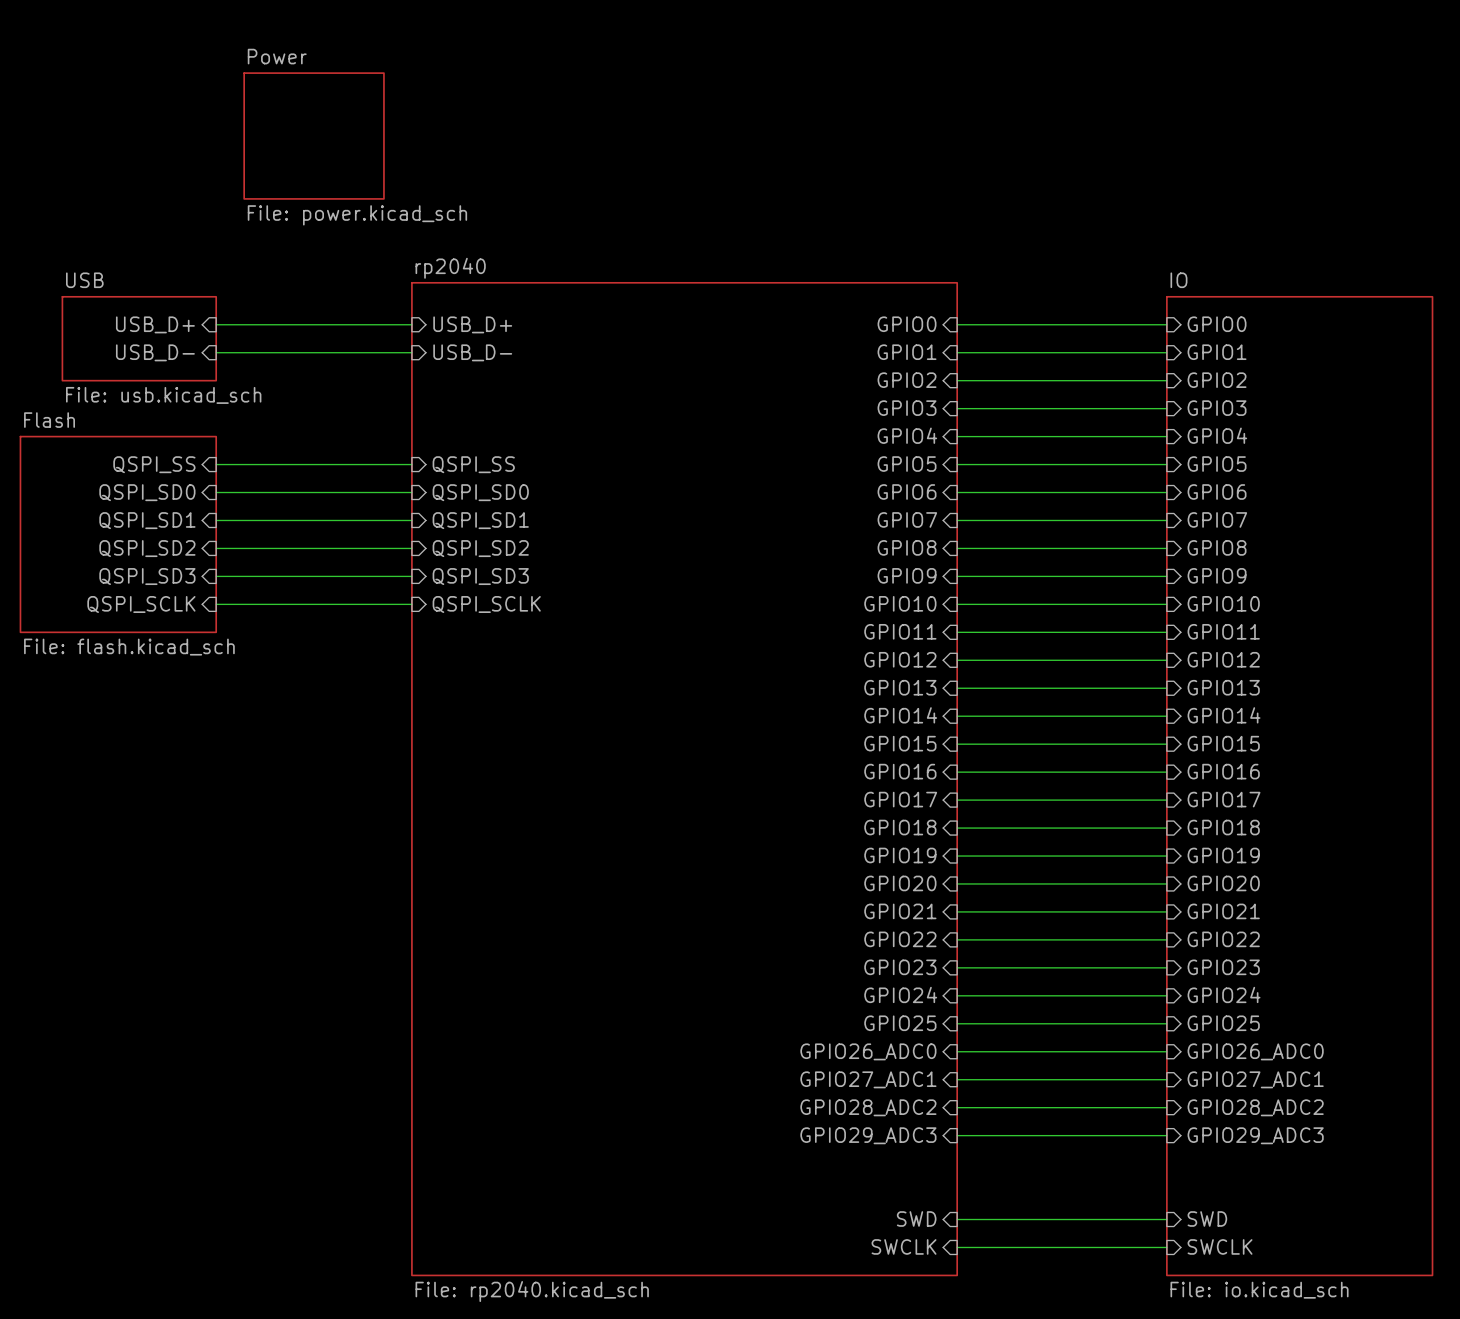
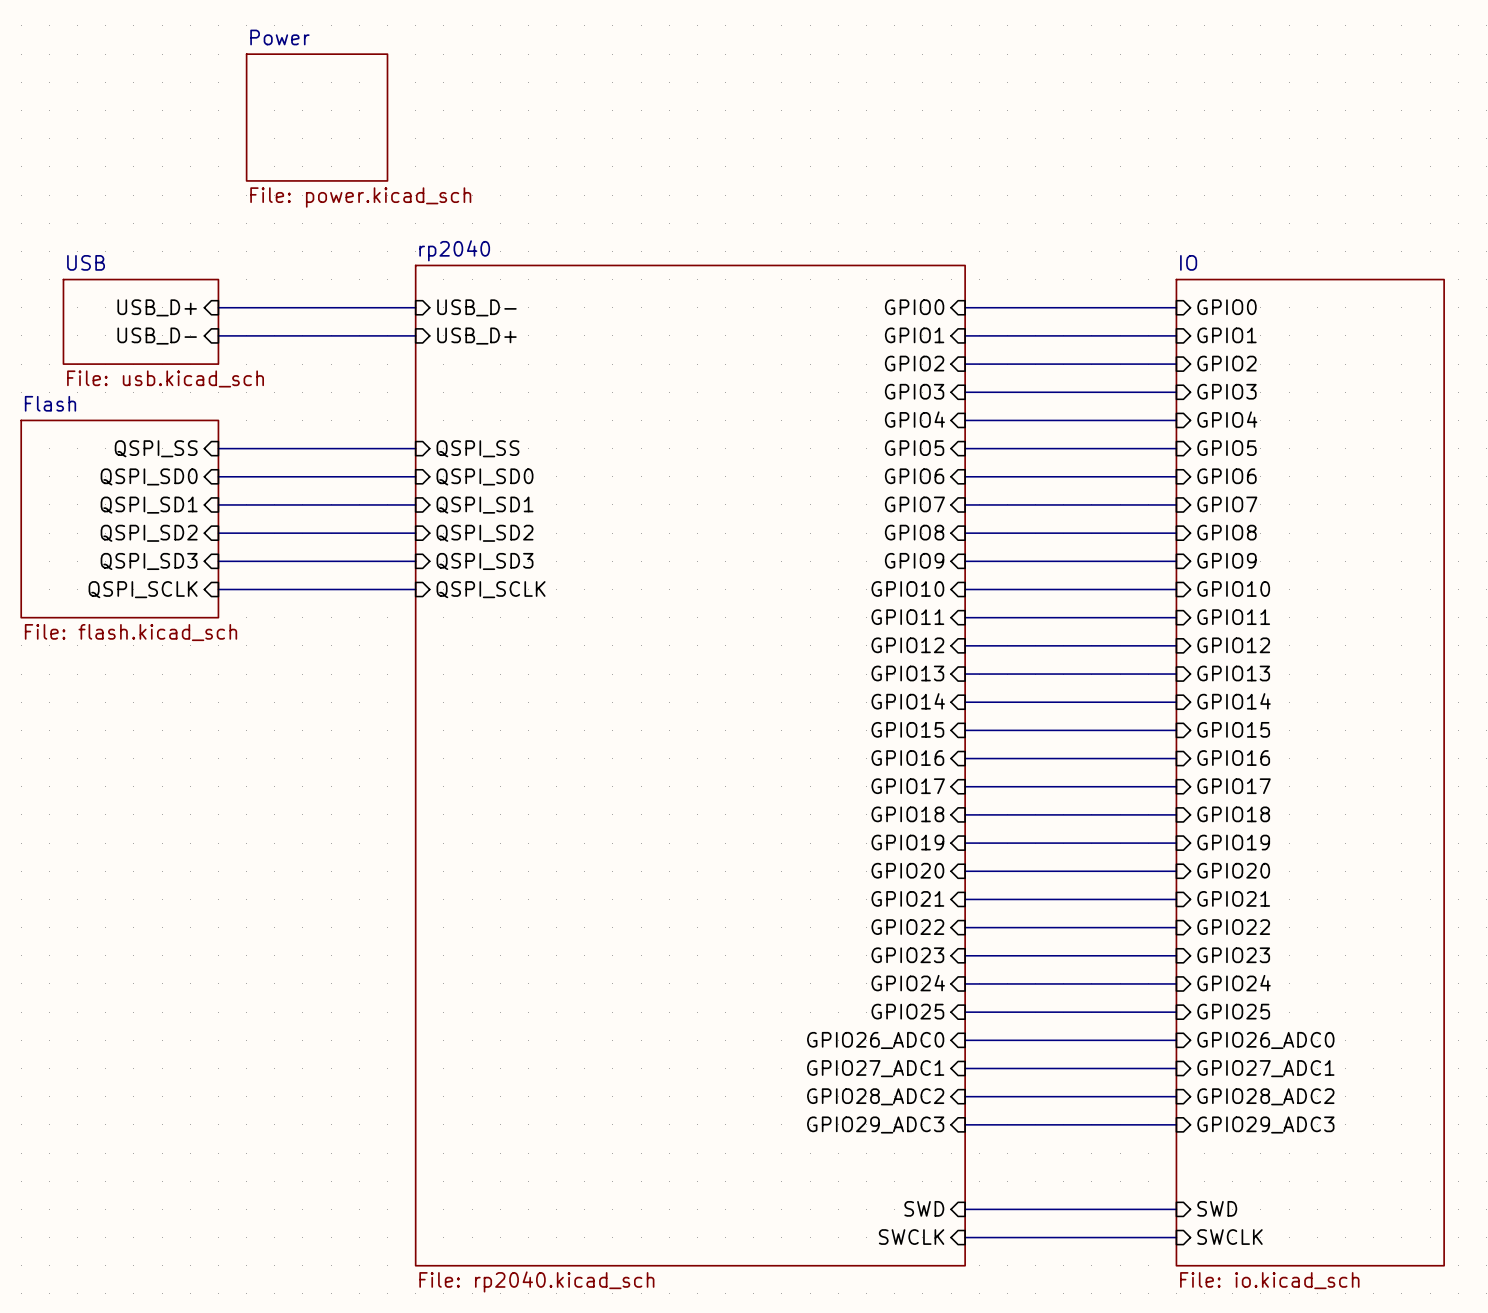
sheet pin: USB_D+ (472, 324) -> USB_D- (476, 307)
sheet pin: USB_D- (472, 352) -> USB_D+ (476, 336)

